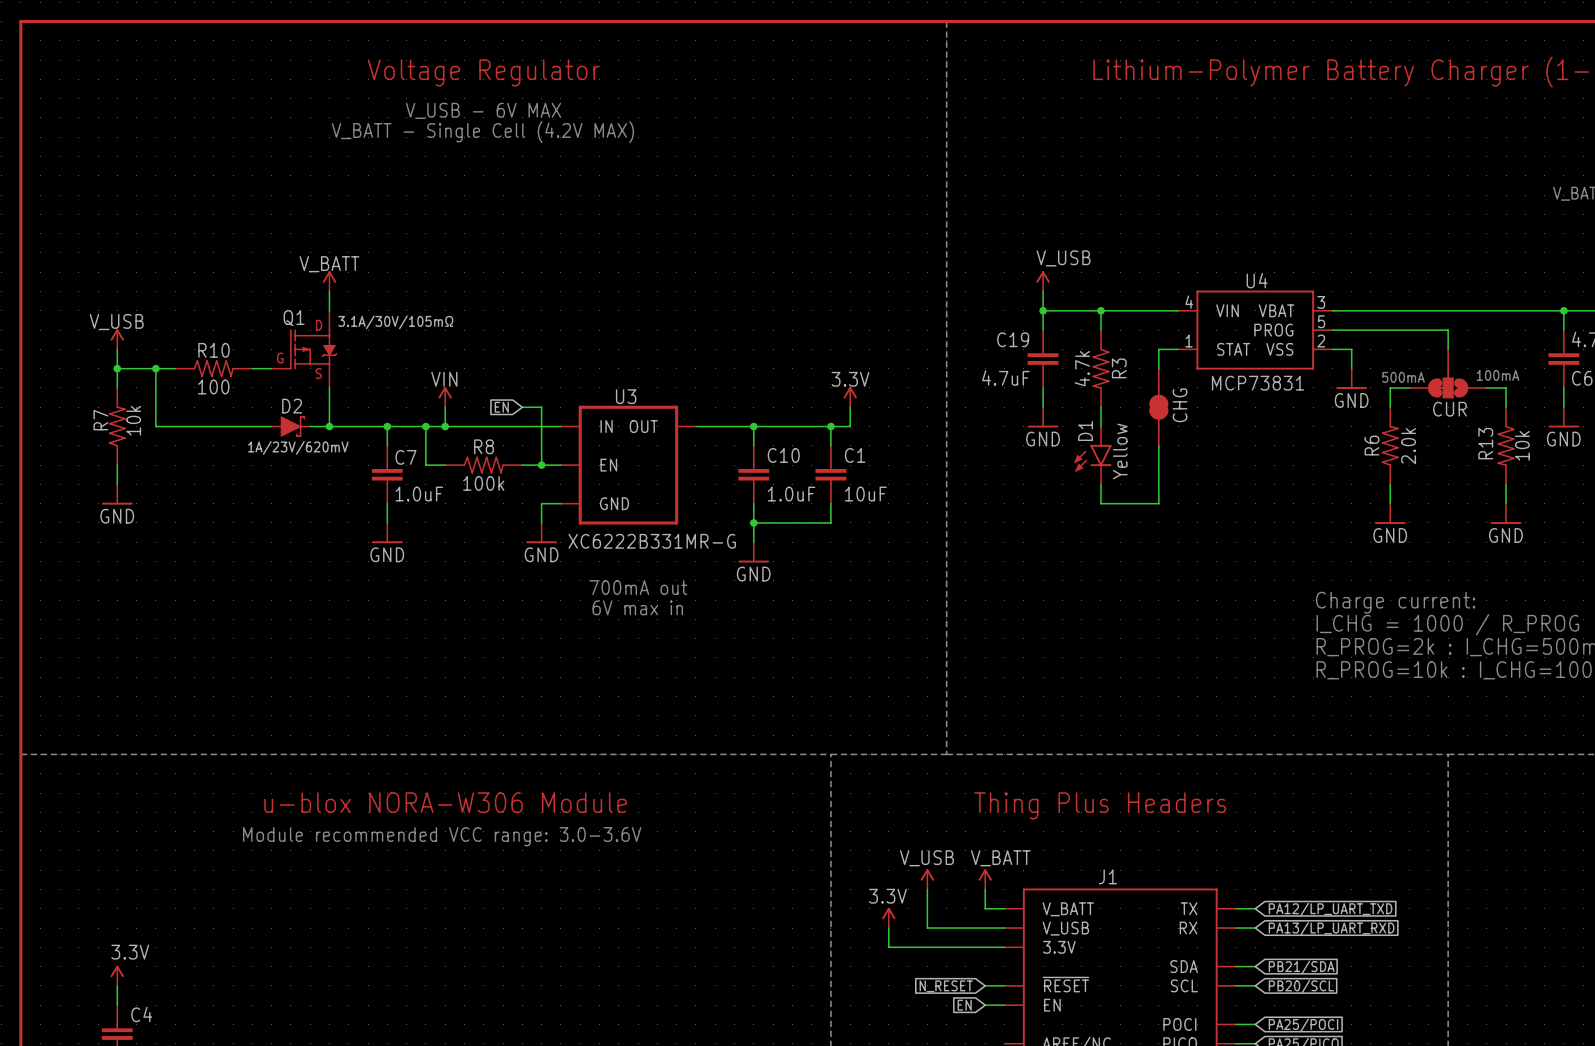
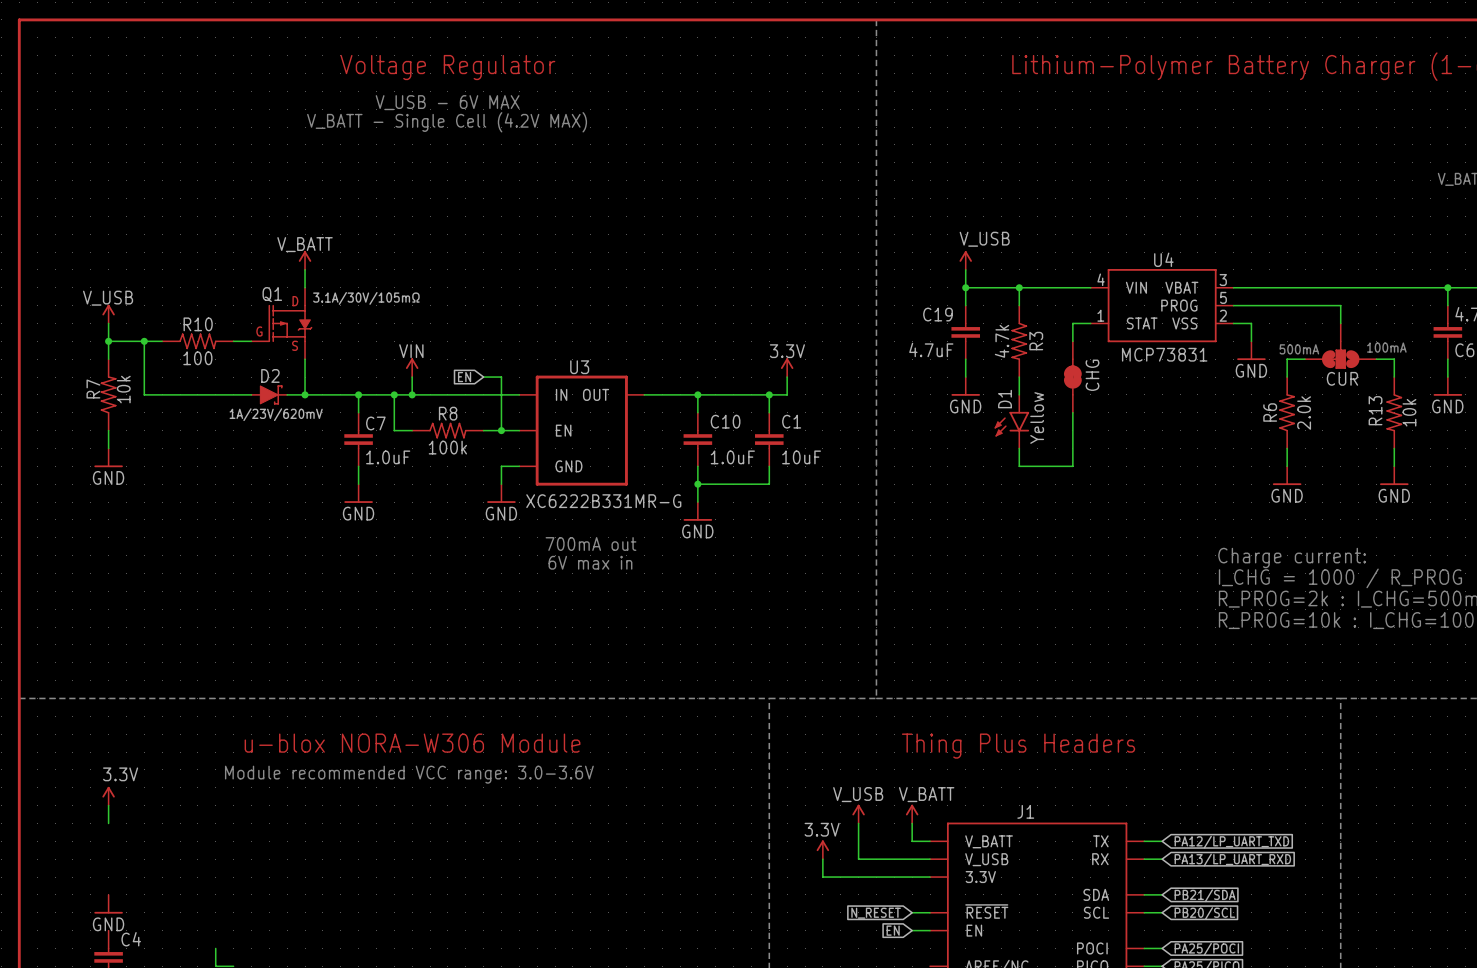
power symbol: none -> 3.3V (108, 796)
power symbol: 3.3V (117, 975) -> GND (108, 904)
wire: (117, 985) (117, 1005) -> (108, 805) (108, 823)
wire: none -> (215, 948) (215, 966) (233, 966)

